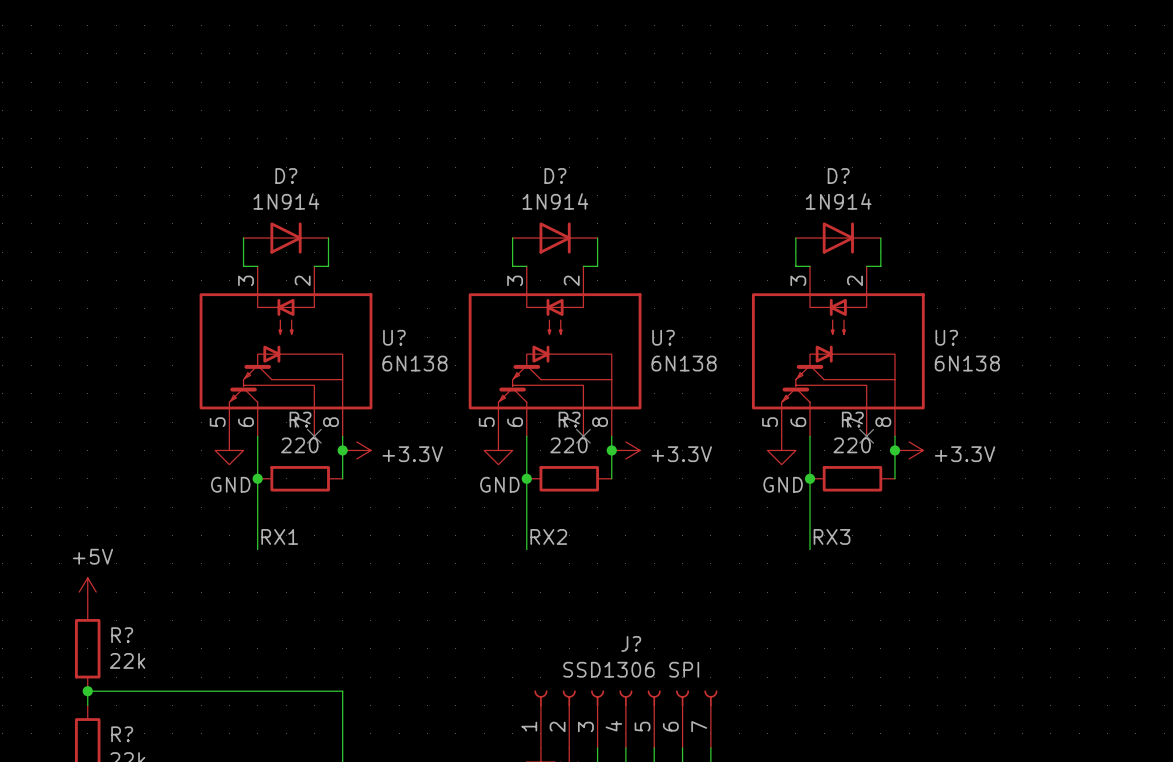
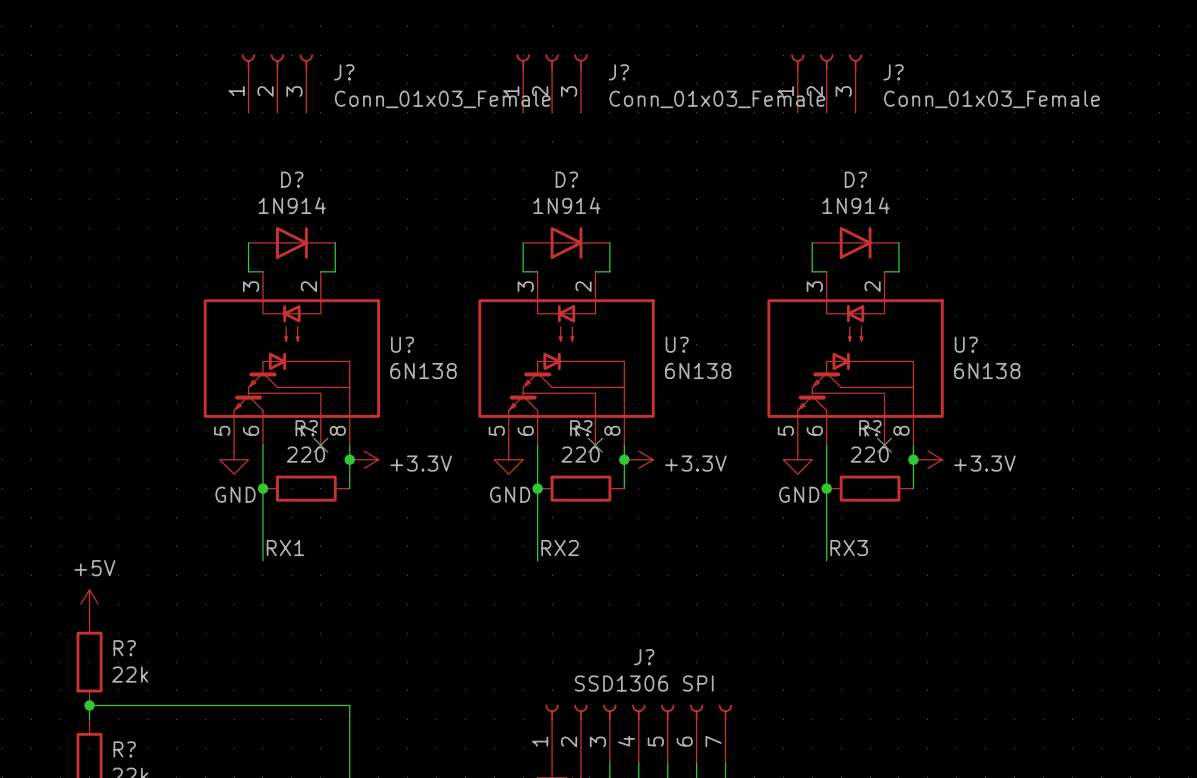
J?: none -> Conn_01x03_Female (277, 83)
J?: none -> Conn_01x03_Female (552, 83)
J?: none -> Conn_01x03_Female (826, 83)

